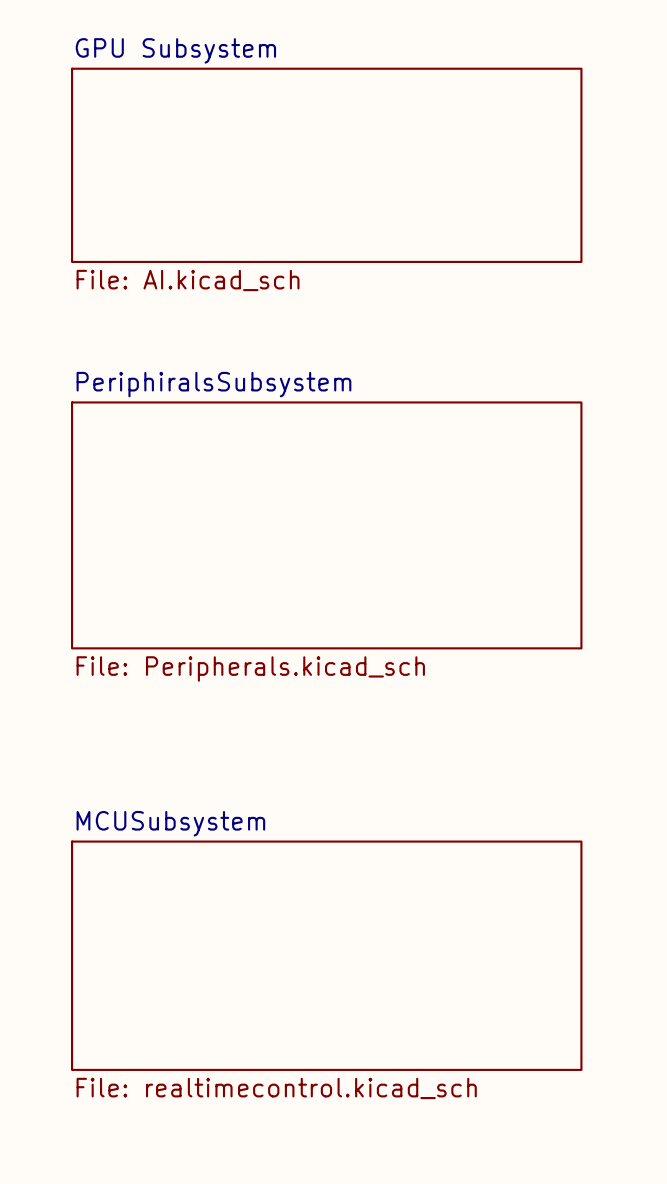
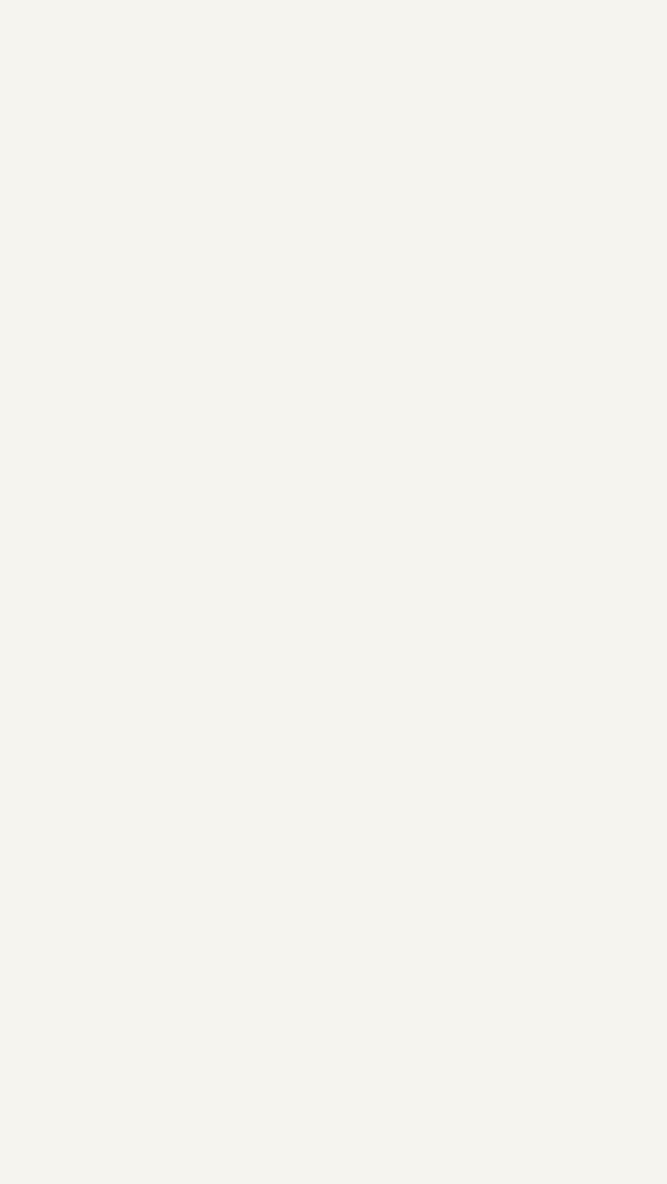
sheet GPU Subsystem: File: AI.kicad_sch (326, 165) -> none
sheet PeriphiralsSubsystem: File: Peripherals.kicad_sch (326, 525) -> none
sheet MCUSubsystem: File: realtimecontrol.kicad_sch (326, 955) -> none

